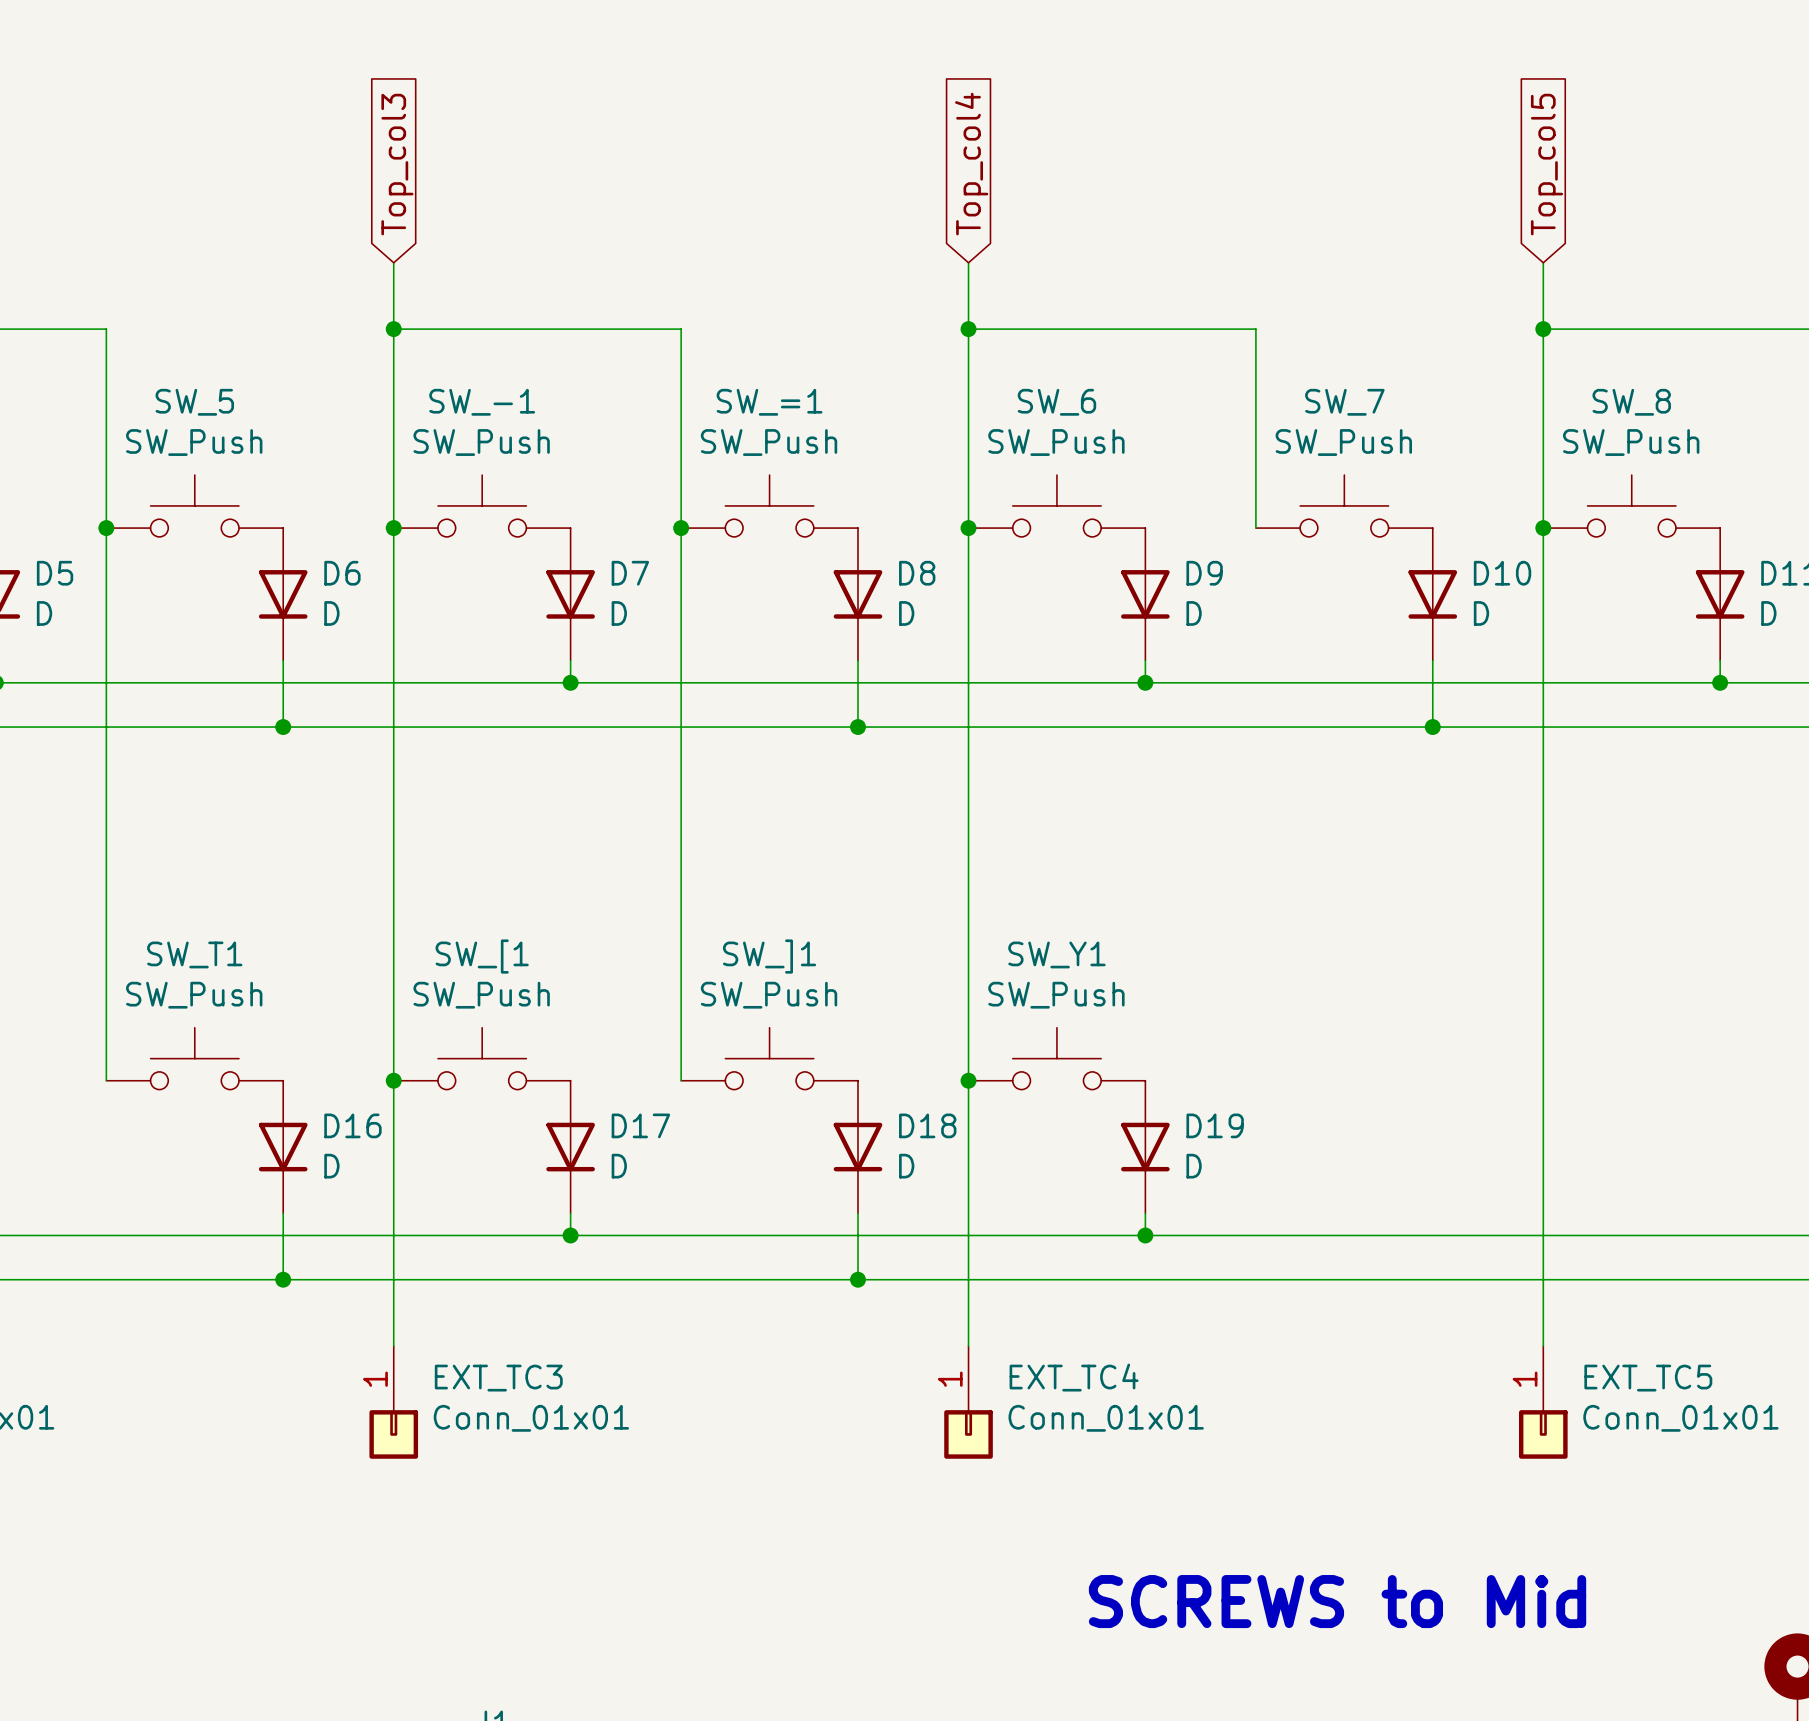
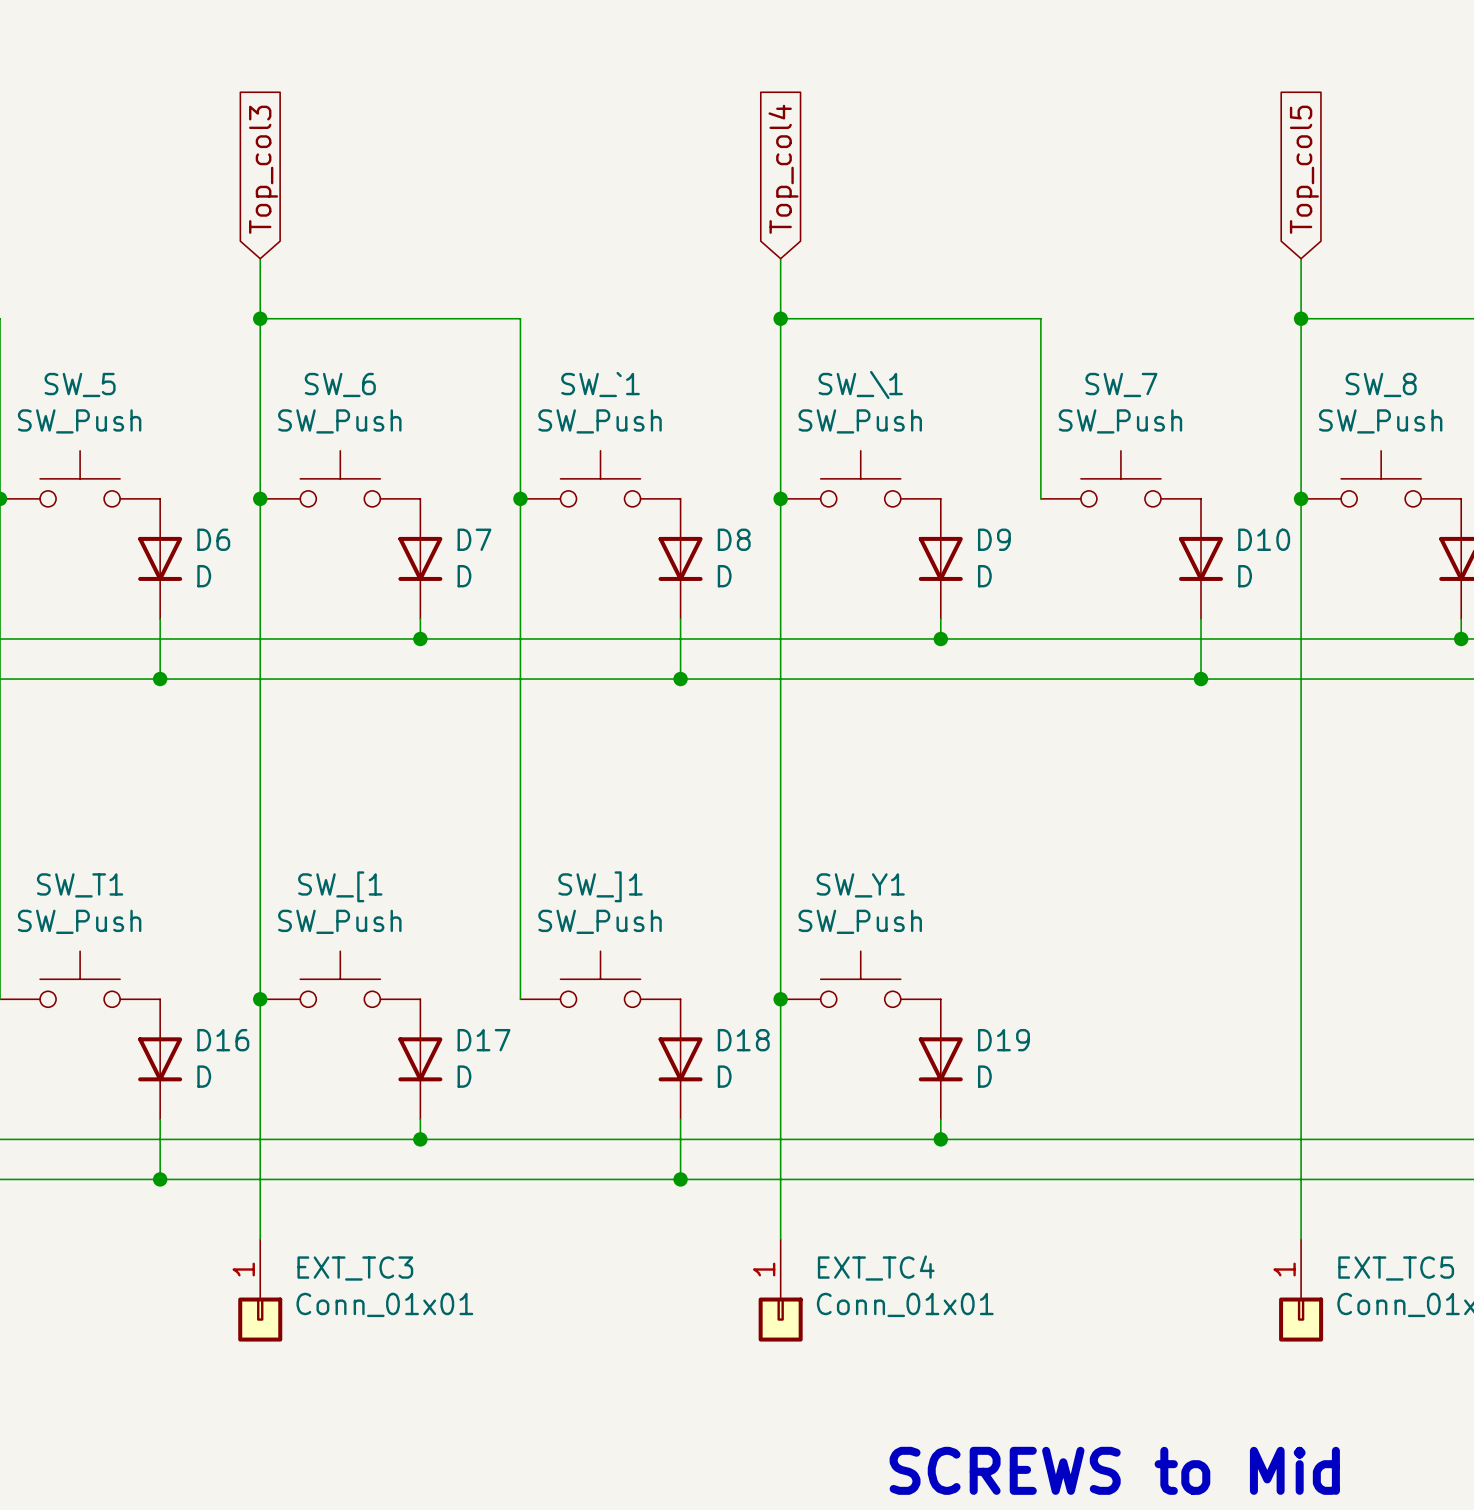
SW_-1 name: SW_-1 (482, 402) -> SW_6 (340, 384)
SW_=1 name: SW_=1 (769, 402) -> SW_`1 (600, 384)
SW_6 name: SW_6 (1056, 402) -> SW_\1 (860, 384)

